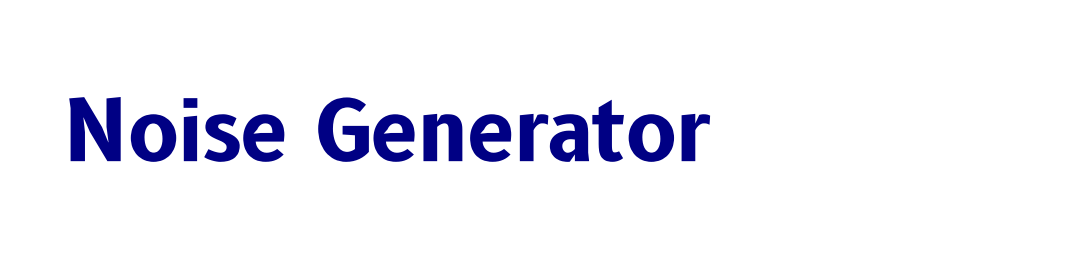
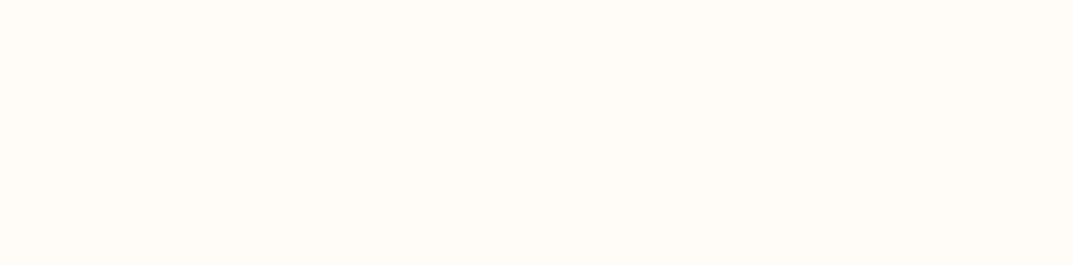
text: Noise Generator (389, 129) -> none

